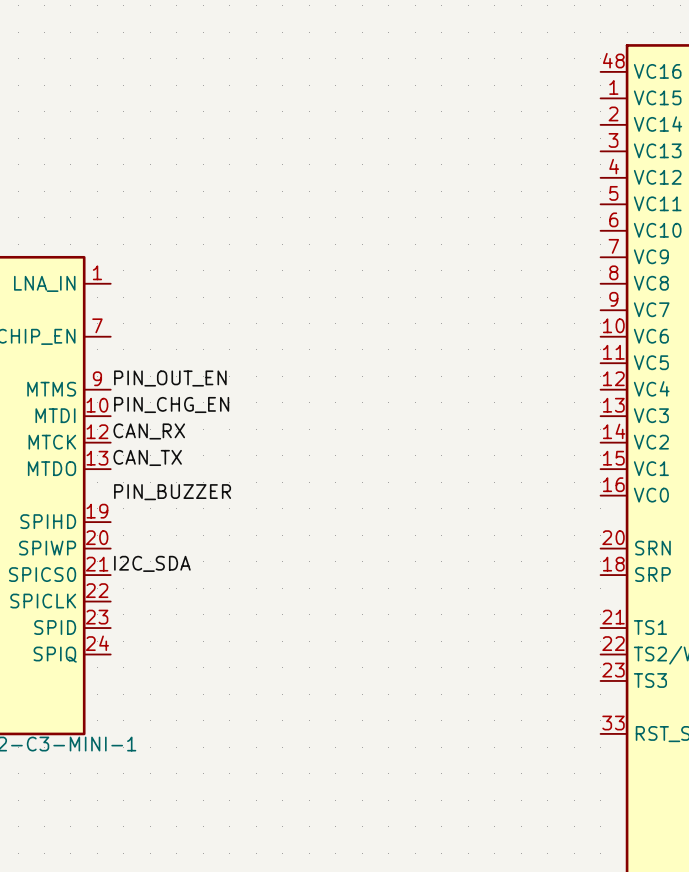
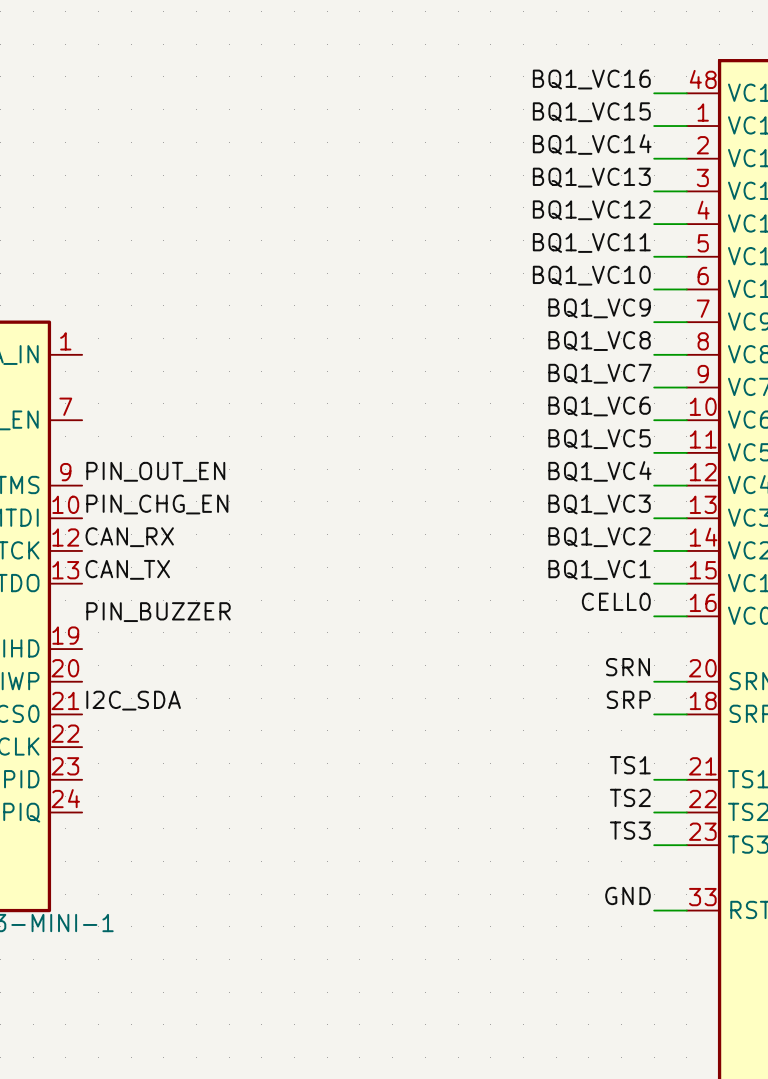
label: none -> BQ1_VC16 (591, 79)
wire: none -> (654, 93) (686, 93)
label: none -> BQ1_VC15 (591, 112)
wire: none -> (654, 126) (686, 126)
label: none -> BQ1_VC14 (592, 144)
wire: none -> (654, 158) (686, 158)
label: none -> BQ1_VC13 (591, 177)
wire: none -> (654, 191) (686, 191)
label: none -> BQ1_VC12 (591, 210)
wire: none -> (654, 224) (686, 224)
label: none -> BQ1_VC11 (591, 242)
wire: none -> (654, 256) (686, 256)
label: none -> BQ1_VC10 (591, 275)
wire: none -> (654, 289) (686, 289)
label: none -> BQ1_VC9 (599, 308)
wire: none -> (654, 322) (686, 322)
label: none -> BQ1_VC8 (599, 341)
wire: none -> (654, 354) (686, 354)
label: none -> BQ1_VC7 (599, 373)
wire: none -> (654, 387) (686, 387)
label: none -> BQ1_VC6 (599, 406)
wire: none -> (654, 420) (686, 420)
label: none -> BQ1_VC5 (599, 439)
wire: none -> (654, 452) (686, 452)
label: none -> BQ1_VC4 (599, 471)
wire: none -> (654, 485) (686, 485)
label: none -> BQ1_VC3 (599, 504)
wire: none -> (654, 518) (686, 518)
label: none -> BQ1_VC2 (599, 537)
wire: none -> (654, 550) (686, 550)
label: none -> BQ1_VC1 (599, 569)
wire: none -> (654, 583) (686, 583)
label: none -> CELL0 (616, 601)
wire: none -> (654, 616) (686, 616)
label: none -> SRN (627, 667)
wire: none -> (654, 681) (686, 681)
label: none -> SRP (628, 699)
wire: none -> (654, 714) (686, 714)
label: none -> TS1 (630, 765)
wire: none -> (654, 779) (686, 779)
label: none -> TS2 (630, 797)
wire: none -> (654, 812) (686, 812)
label: none -> TS3 (630, 830)
wire: none -> (654, 845) (686, 845)
label: none -> GND (627, 895)
wire: none -> (654, 910) (686, 910)

